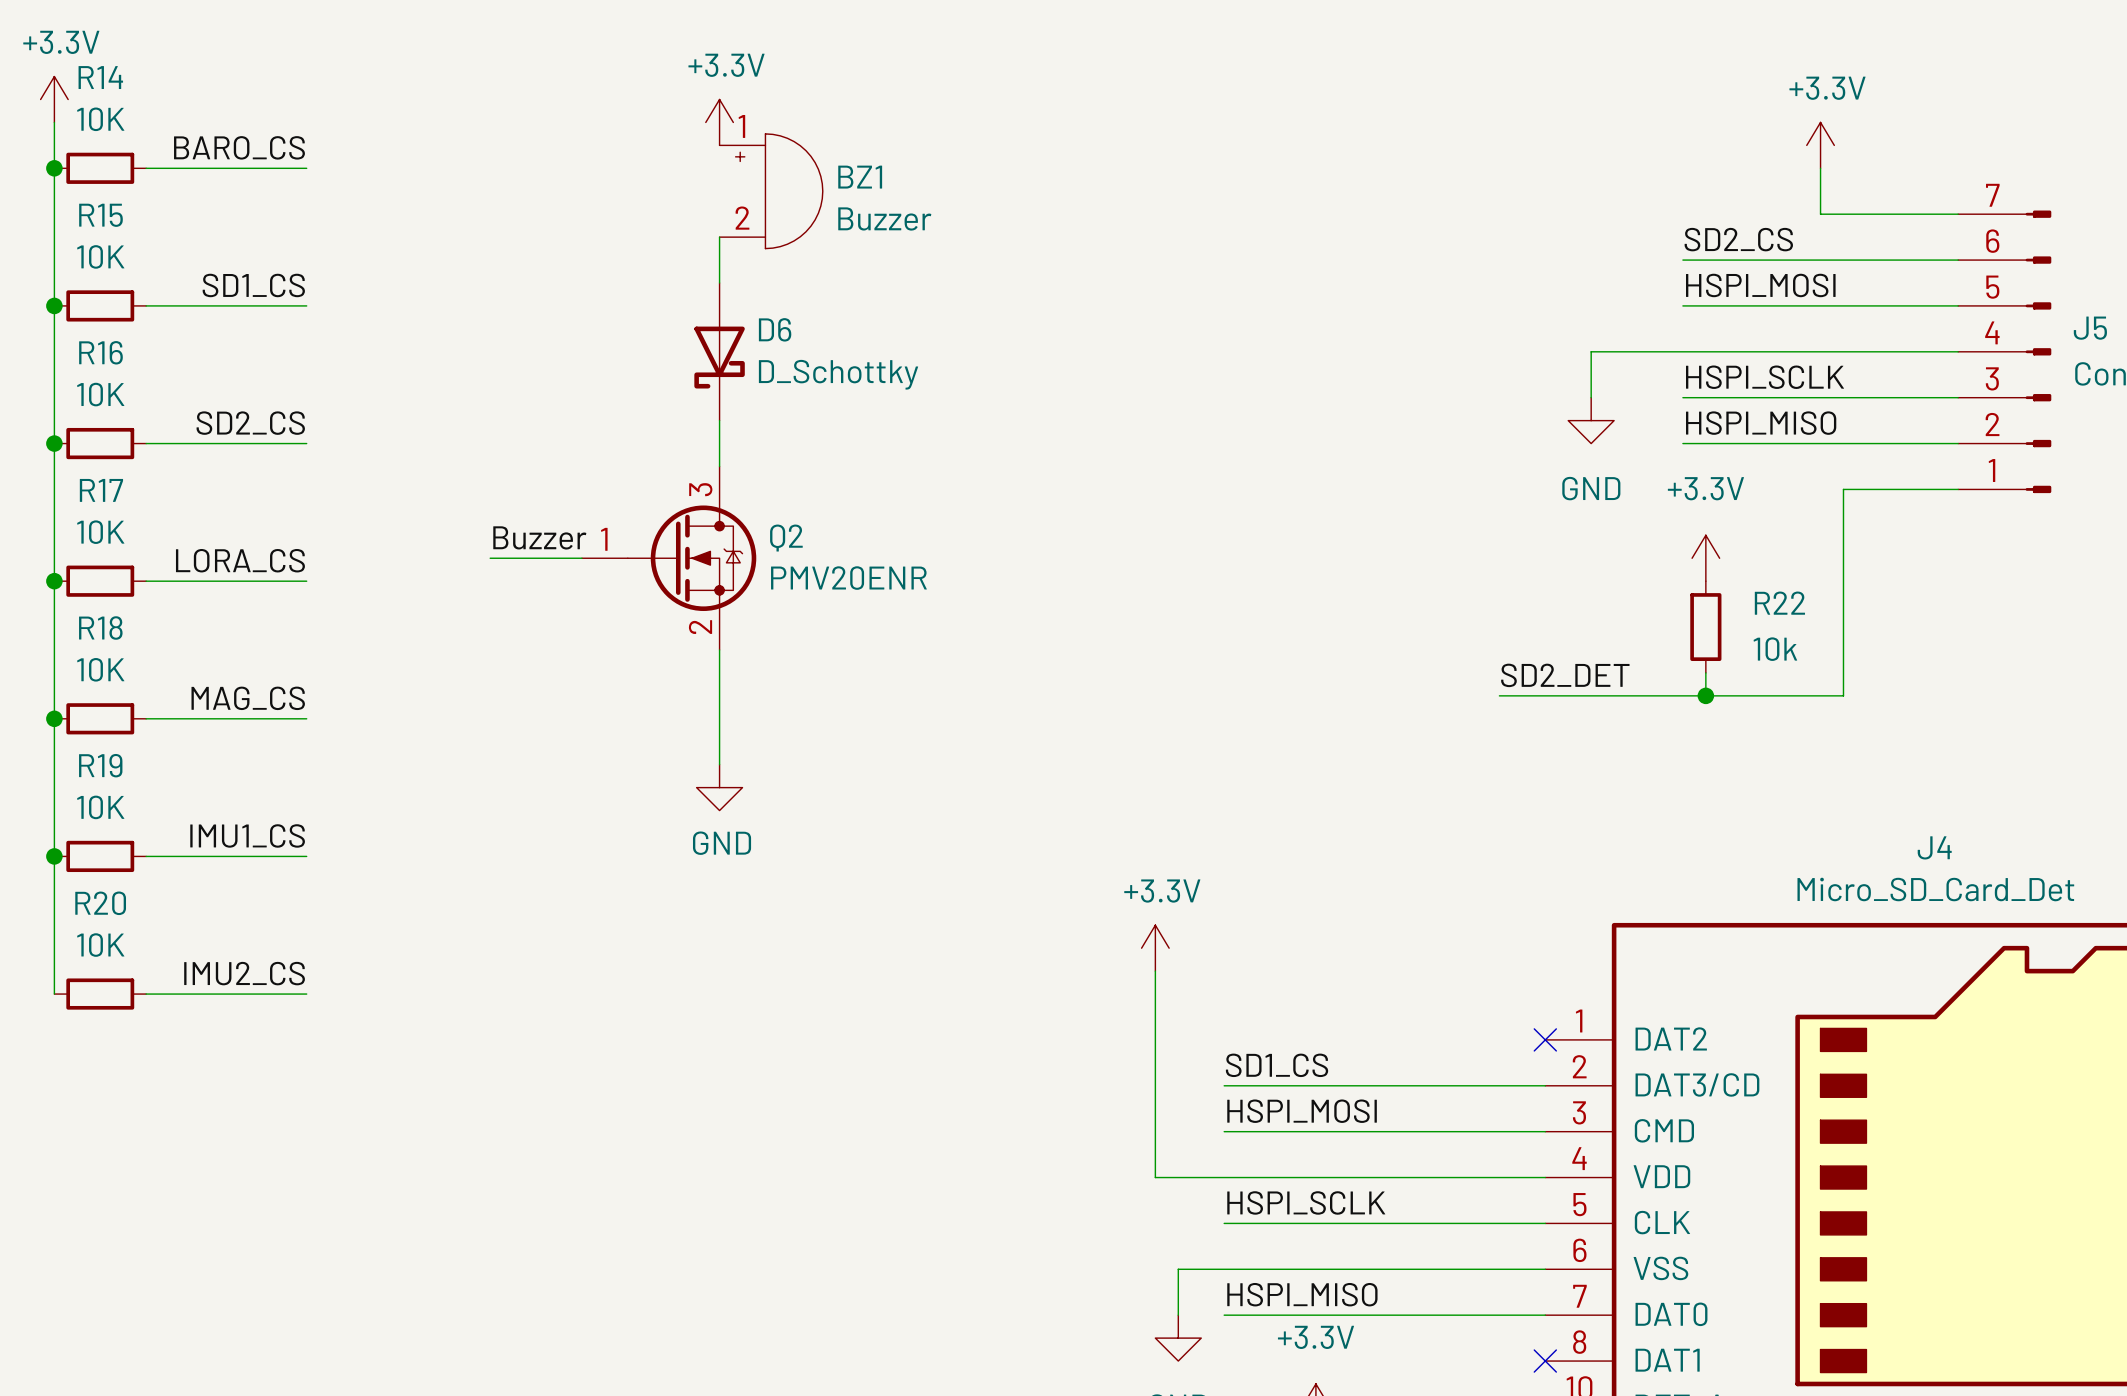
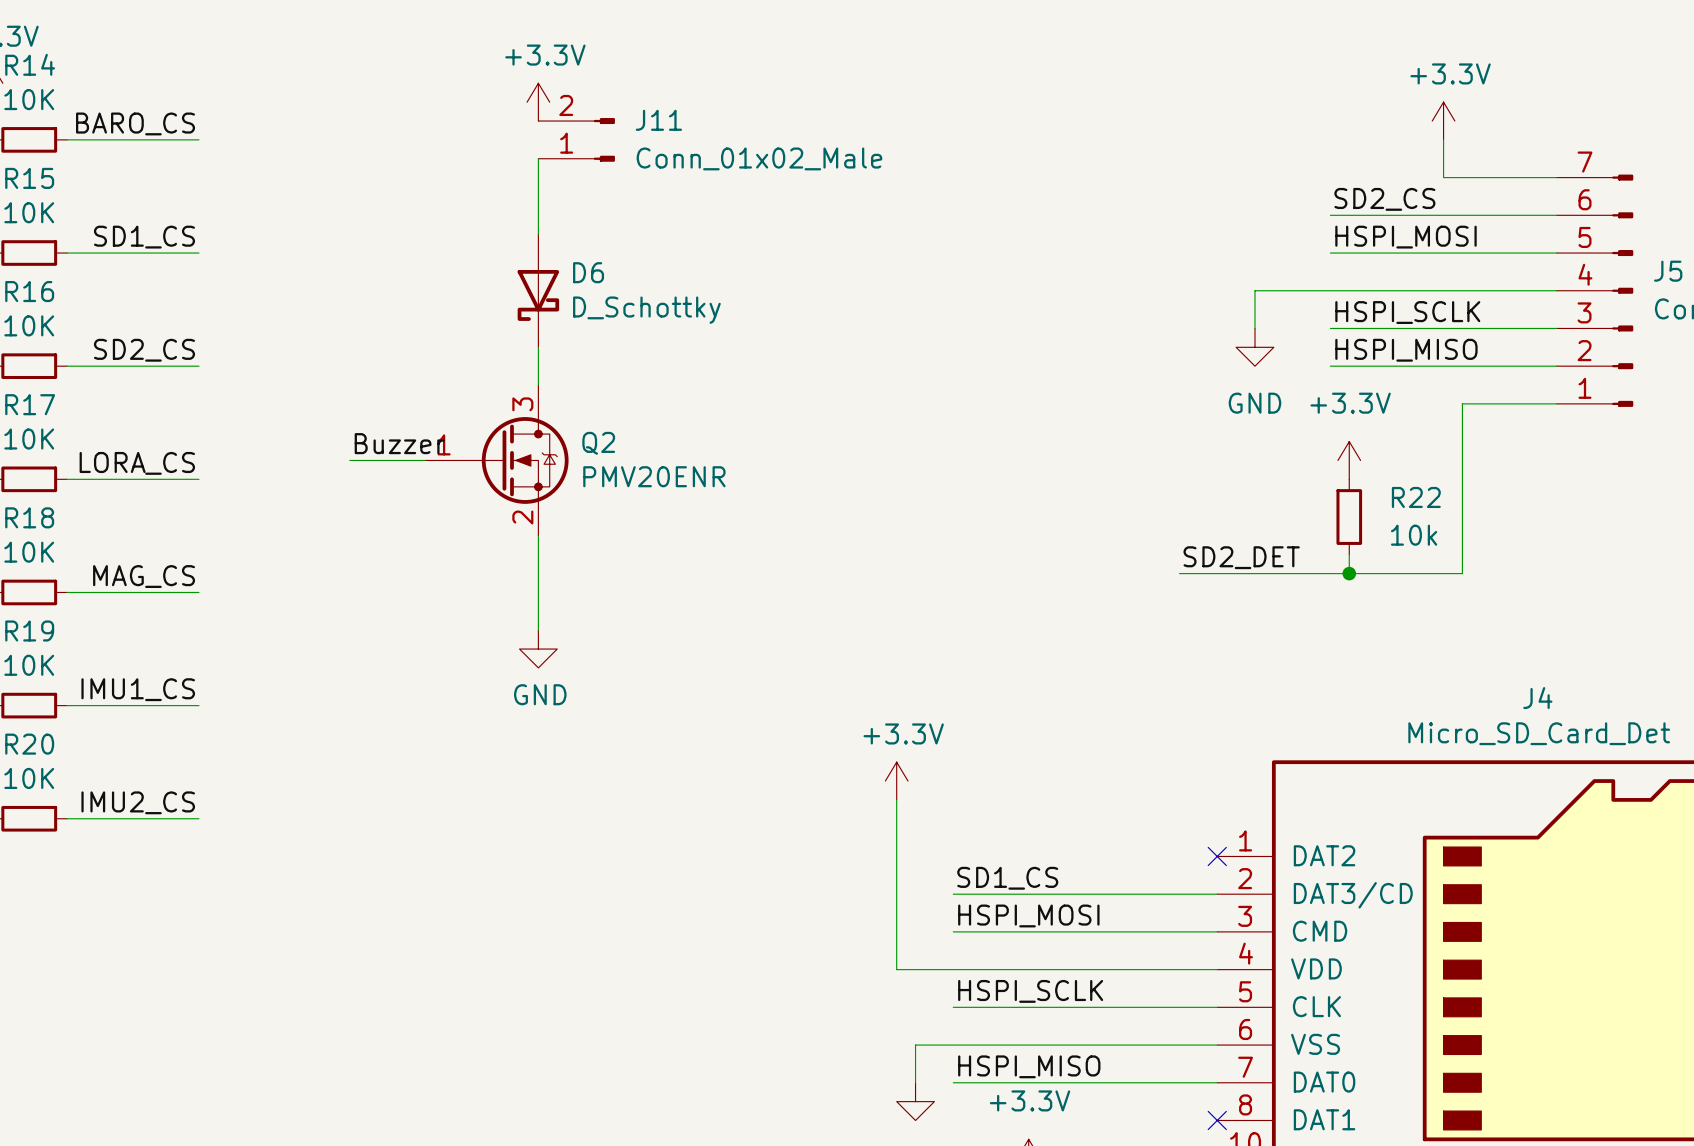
J11: none -> Conn_01x02_Male (576, 139)
wire: none -> (538, 158) (538, 196)
BZ1: Buzzer (771, 191) -> none

